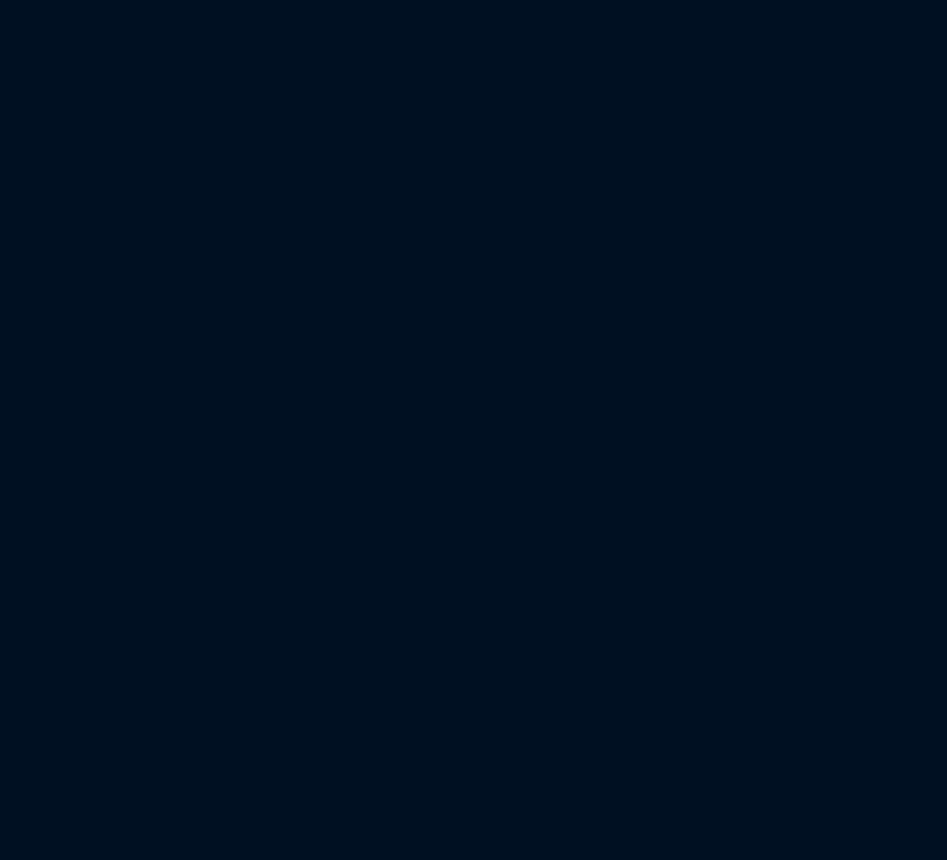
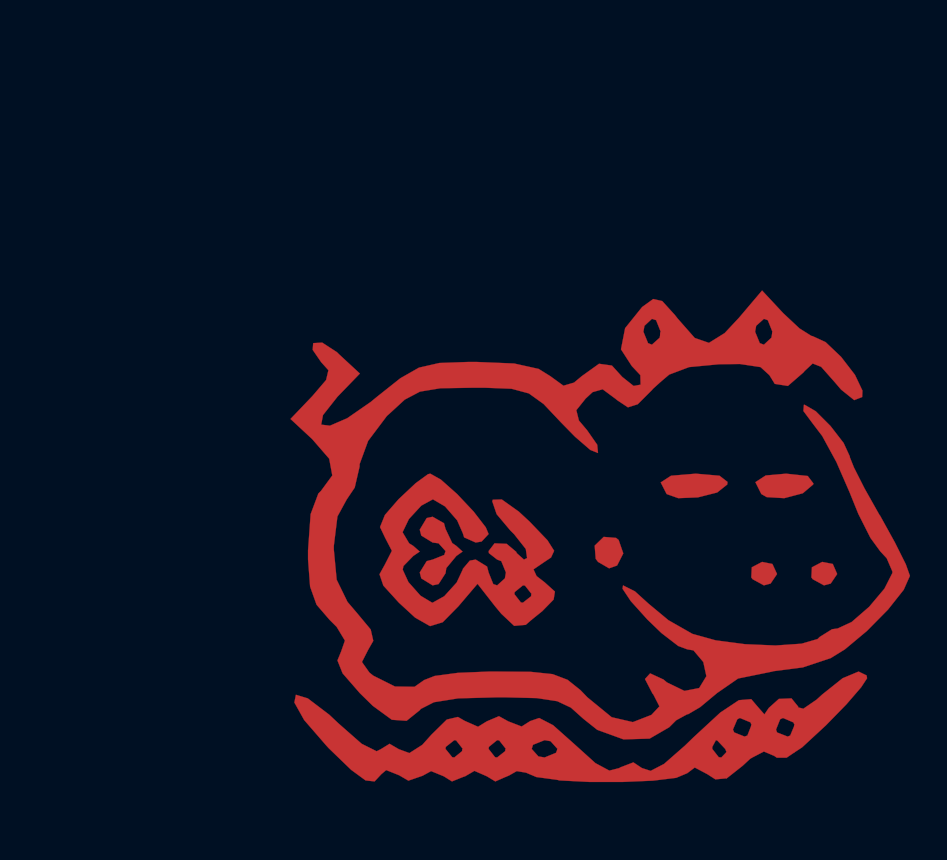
drawing: none -> [290, 290, 911, 783]

